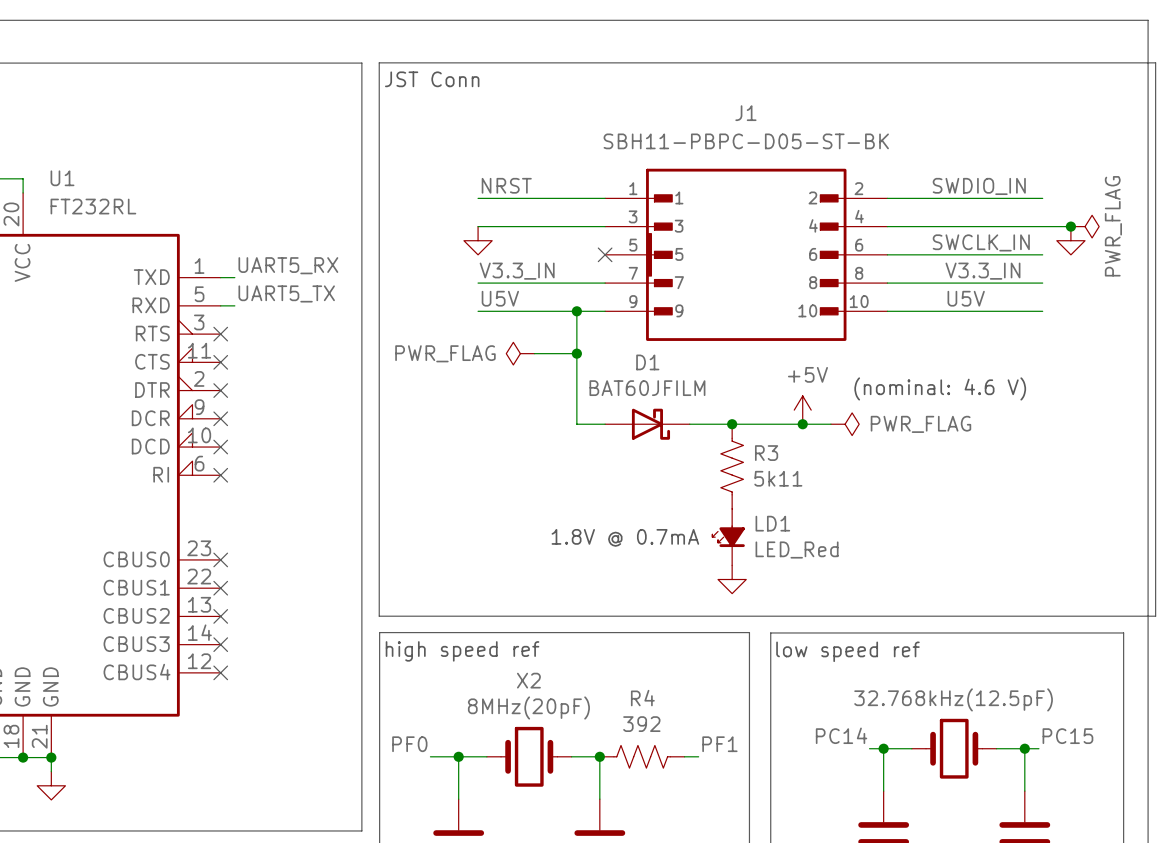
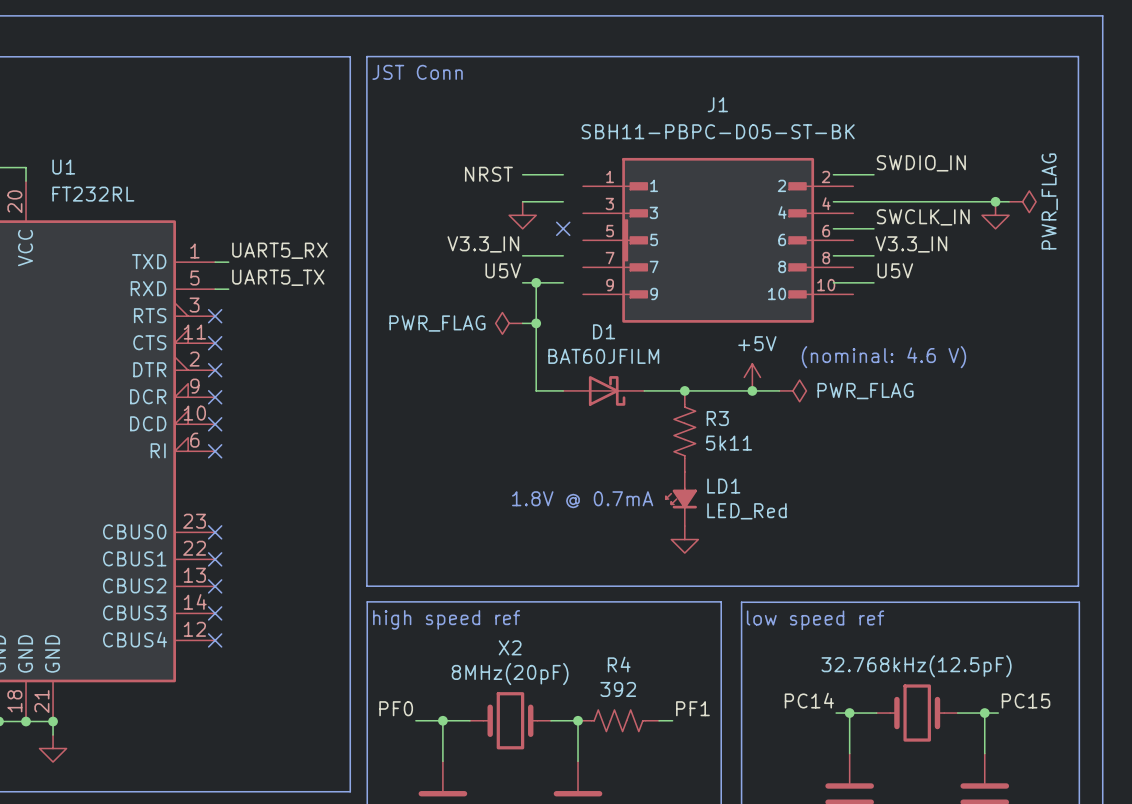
line: (1122, 62) (1155, 62) (1155, 616) (1122, 616) -> (1078, 56) (1078, 586)
wire: none -> (522, 174) (563, 174)
wire: none -> (833, 174) (873, 174)
label position: SWDIO_IN (979, 186) -> SWDIO_IN (921, 163)
wire: (478, 198) (605, 198) -> none
wire: (887, 198) (1042, 198) -> none
wire: none -> (522, 201) (563, 201)
wire: (478, 226) (605, 226) -> none
wire: (887, 226) (1070, 226) -> (833, 201) (1009, 201)
junction position: (1070, 226) -> (995, 201)
power symbol position: PWR_FLAG (1085, 226) -> PWR_FLAG (1022, 201)
power symbol position: (478, 240) -> (522, 215)
power symbol position: (1070, 240) -> (995, 215)
wire: none -> (833, 228) (873, 228)
label position: SWCLK_IN (981, 242) -> SWCLK_IN (923, 217)
no-connect mark position: (605, 254) -> (563, 228)
wire: (887, 254) (1042, 254) -> none
label position: V3.3_IN (517, 271) -> V3.3_IN (483, 244)
wire: none -> (522, 255) (563, 255)
wire: none -> (833, 255) (873, 255)
label position: V3.3_IN (982, 271) -> V3.3_IN (911, 244)
wire: (478, 283) (605, 283) -> none
wire: (887, 283) (1042, 283) -> none
label position: U5V (500, 298) -> U5V (503, 270)
label position: U5V (966, 298) -> U5V (895, 270)
junction: none -> (536, 282)
wire: none -> (833, 282) (873, 282)
wire: (478, 311) (605, 311) -> none
wire: (576, 311) (576, 424) (605, 424) -> (536, 282) (536, 390) (563, 390)
junction: (576, 311) -> none
wire: (887, 311) (1042, 311) -> none
wire: none -> (522, 323) (536, 323)
junction: none -> (536, 323)
power symbol position: PWR_FLAG (520, 353) -> PWR_FLAG (509, 323)
wire: (534, 353) (576, 353) -> (522, 282) (563, 282)
junction: (576, 353) -> none
text position: (nominal: 4.6 V) (940, 388) -> (nominal: 4.6 V) (883, 357)
power symbol position: +5V (802, 410) -> +5V (752, 377)
D1 position: (647, 424) -> (603, 390)
wire: (689, 424) (830, 424) -> (644, 390) (779, 390)
junction position: (732, 424) -> (684, 390)
junction position: (802, 424) -> (752, 390)
power symbol position: PWR_FLAG (845, 424) -> PWR_FLAG (792, 390)
R3 position: (732, 466) -> (684, 431)
text position: 1.8V @ 0.7mA (625, 537) -> 1.8V @ 0.7mA (582, 499)
LD1 position: (728, 537) -> (681, 499)
power symbol position: (732, 579) -> (684, 539)

